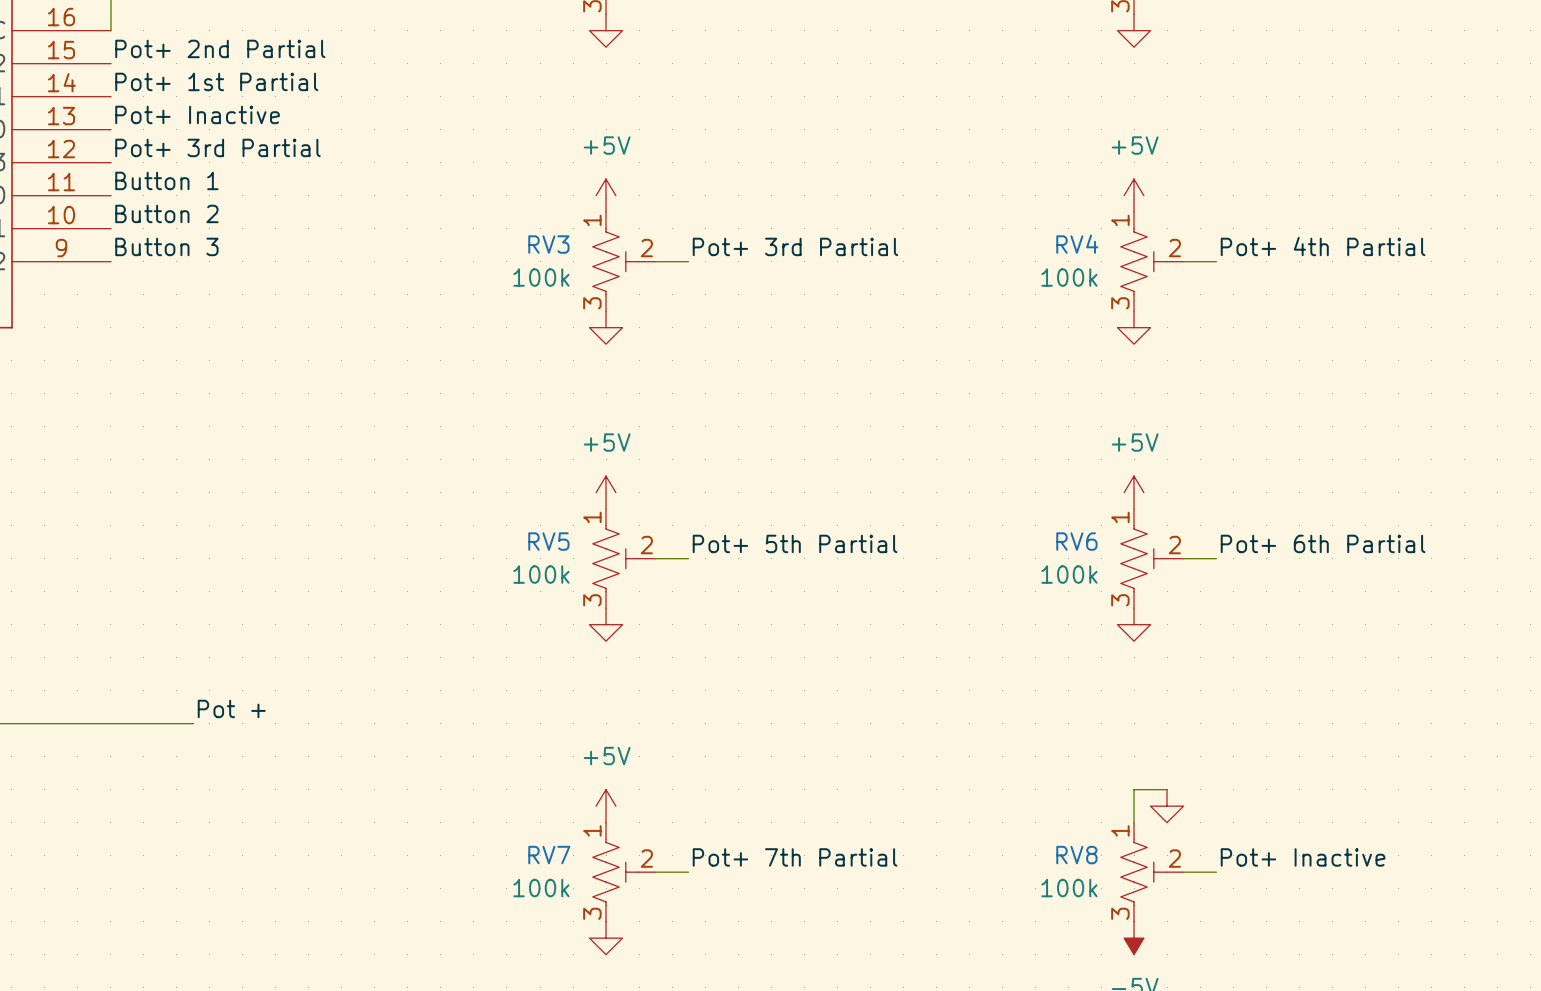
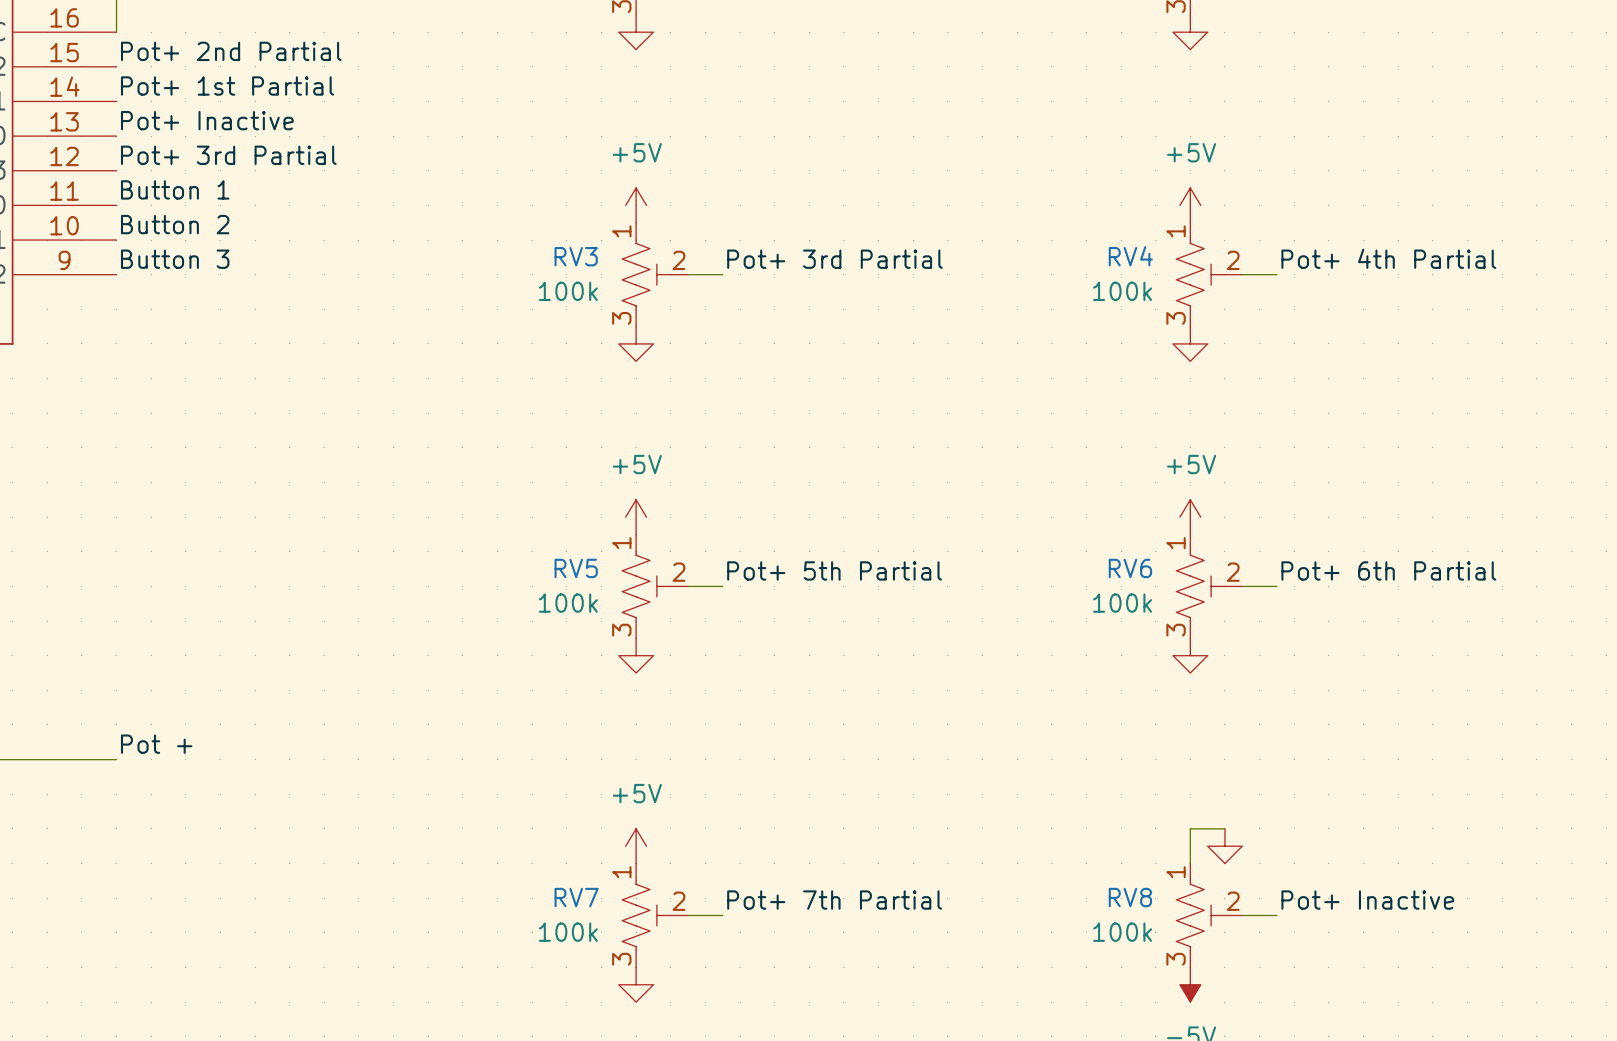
label position: Pot + (231, 708) -> Pot + (156, 744)
wire: (110, 723) (193, 723) -> none

